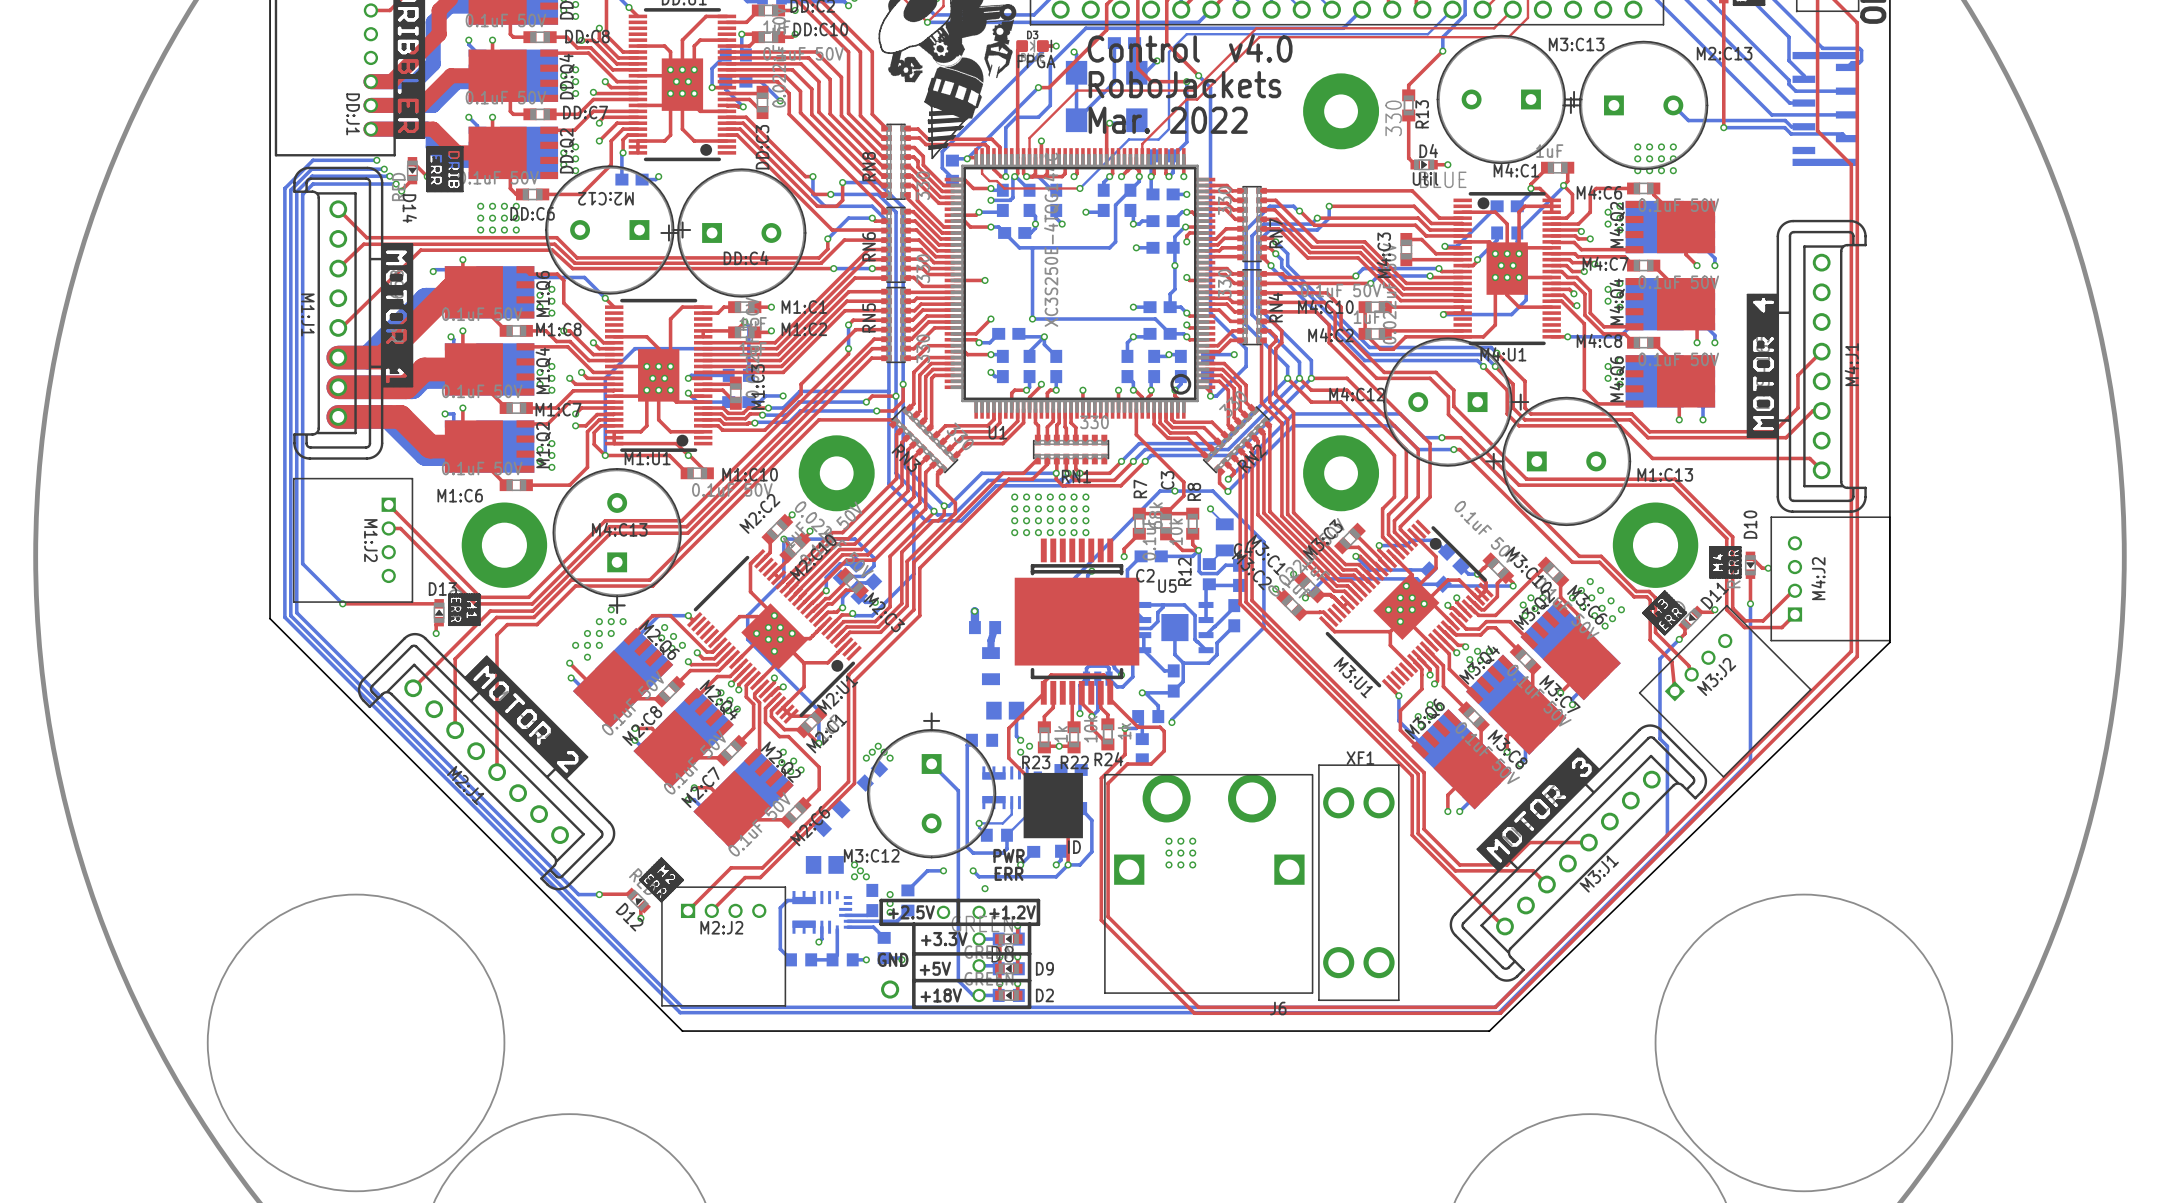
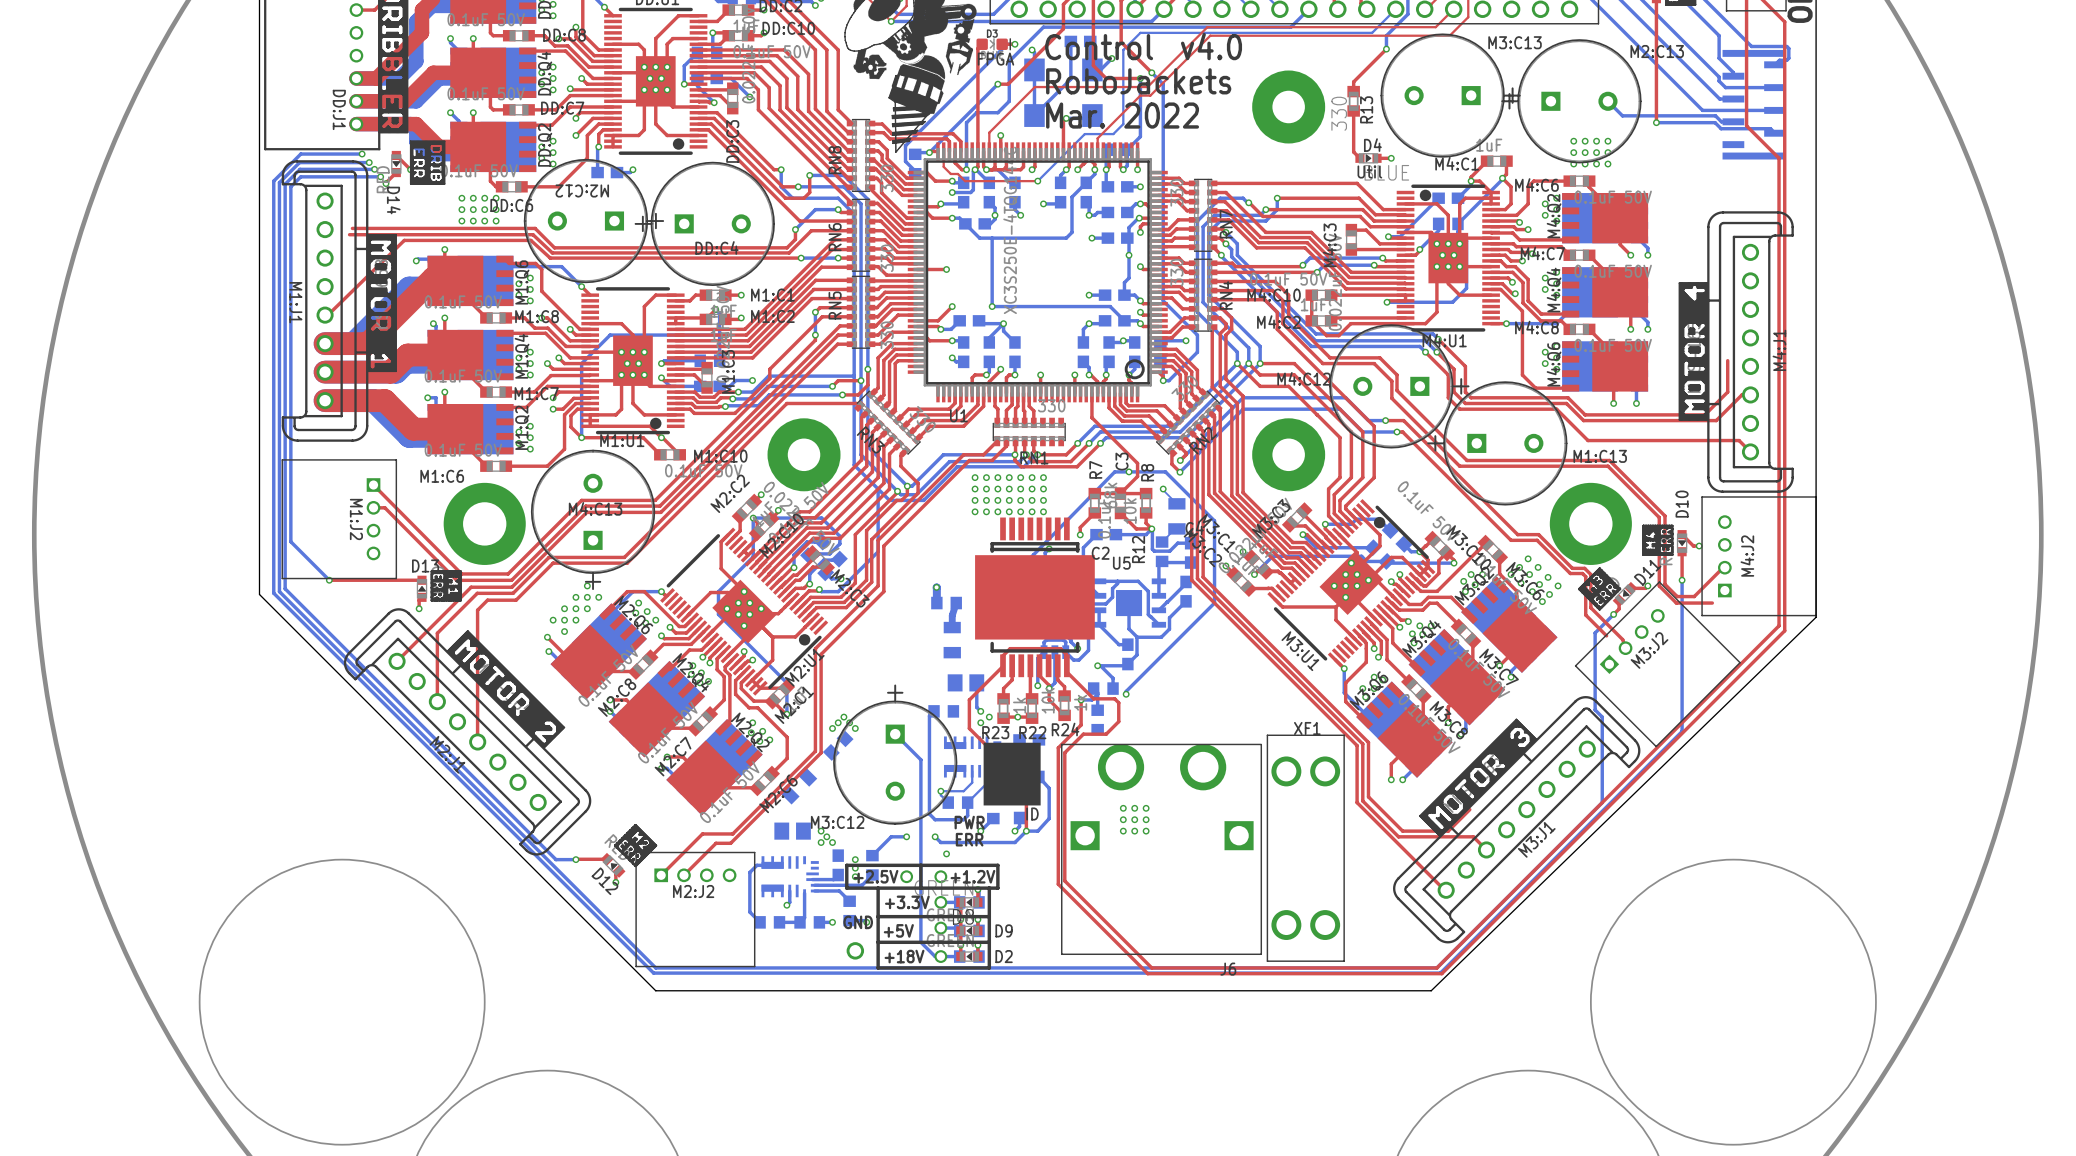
top track: (338, 209) (366, 237) -> none
top track: (363, 244) (338, 268) -> none
top track: (1821, 351) (1797, 375) -> none
top track: (1794, 614) (1781, 627) -> none
top track: (1671, 661) (1674, 691) -> none
top track: (1529, 842) (1588, 842) -> none

